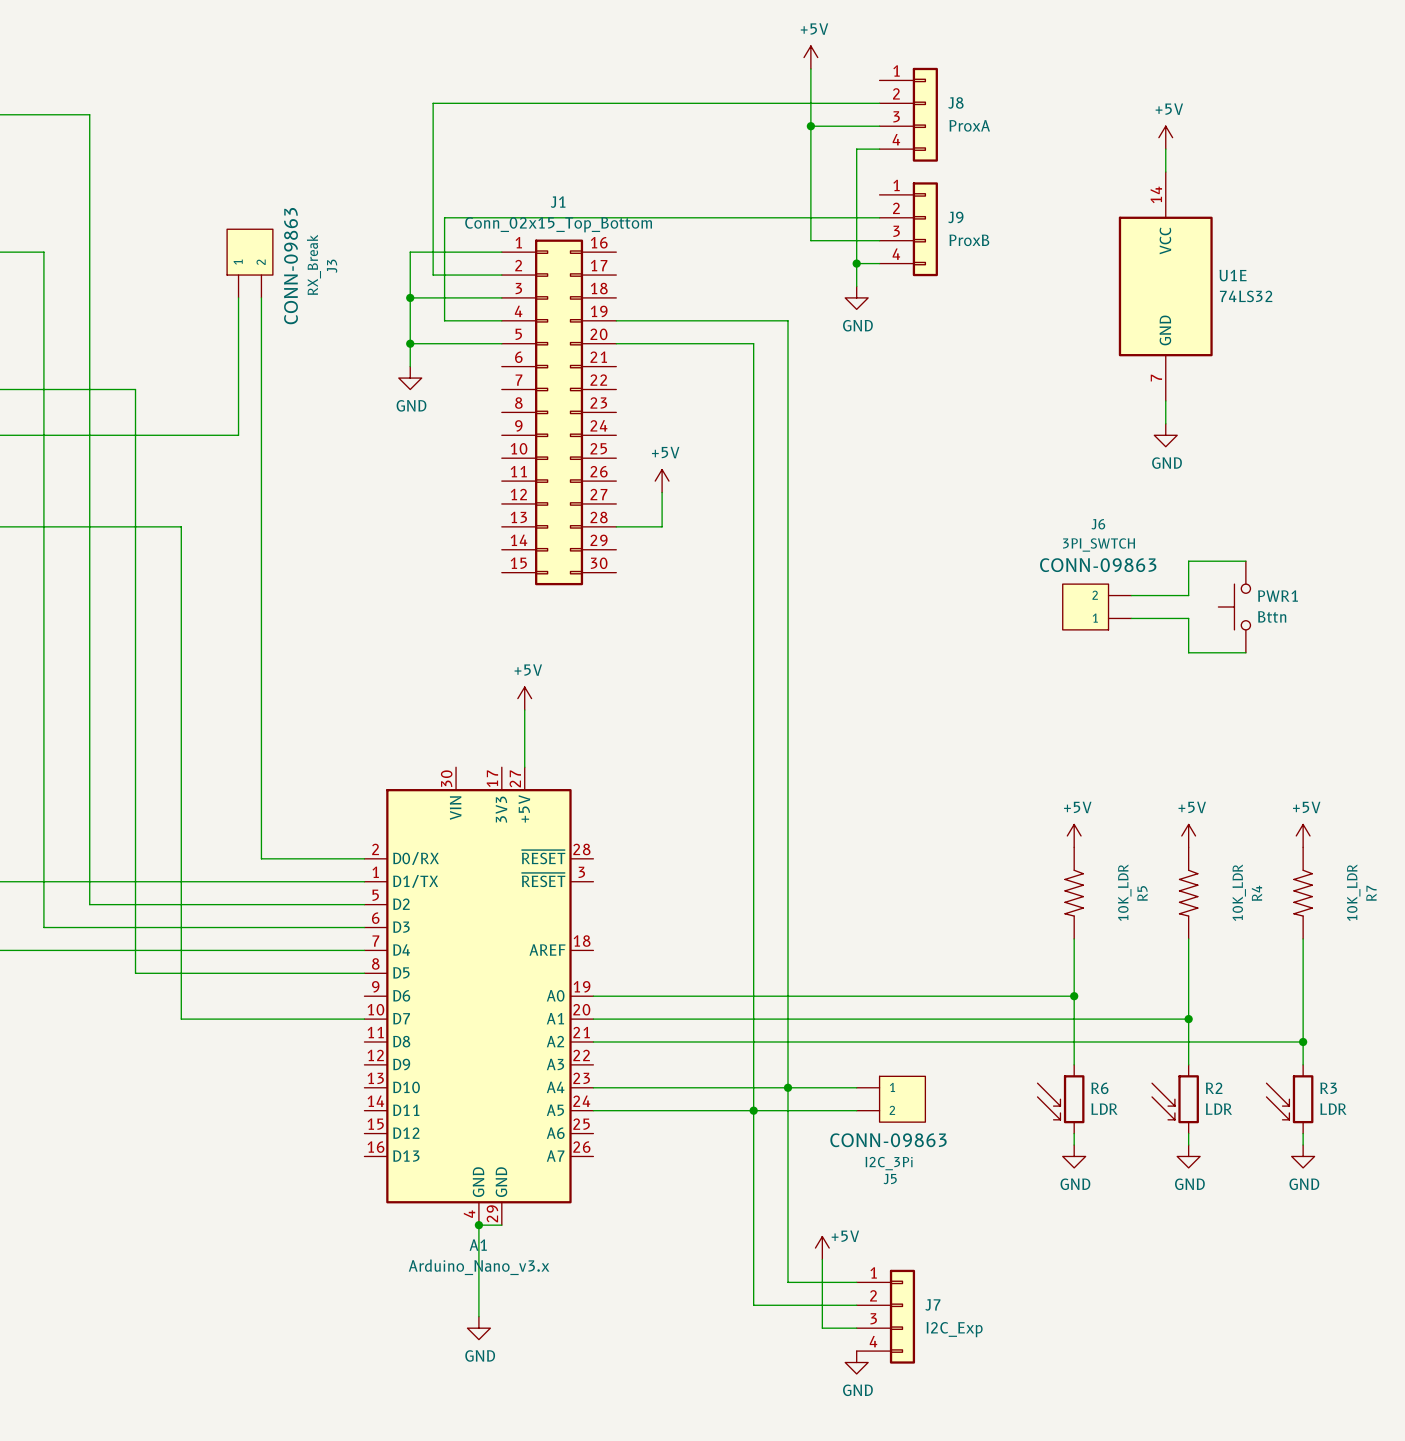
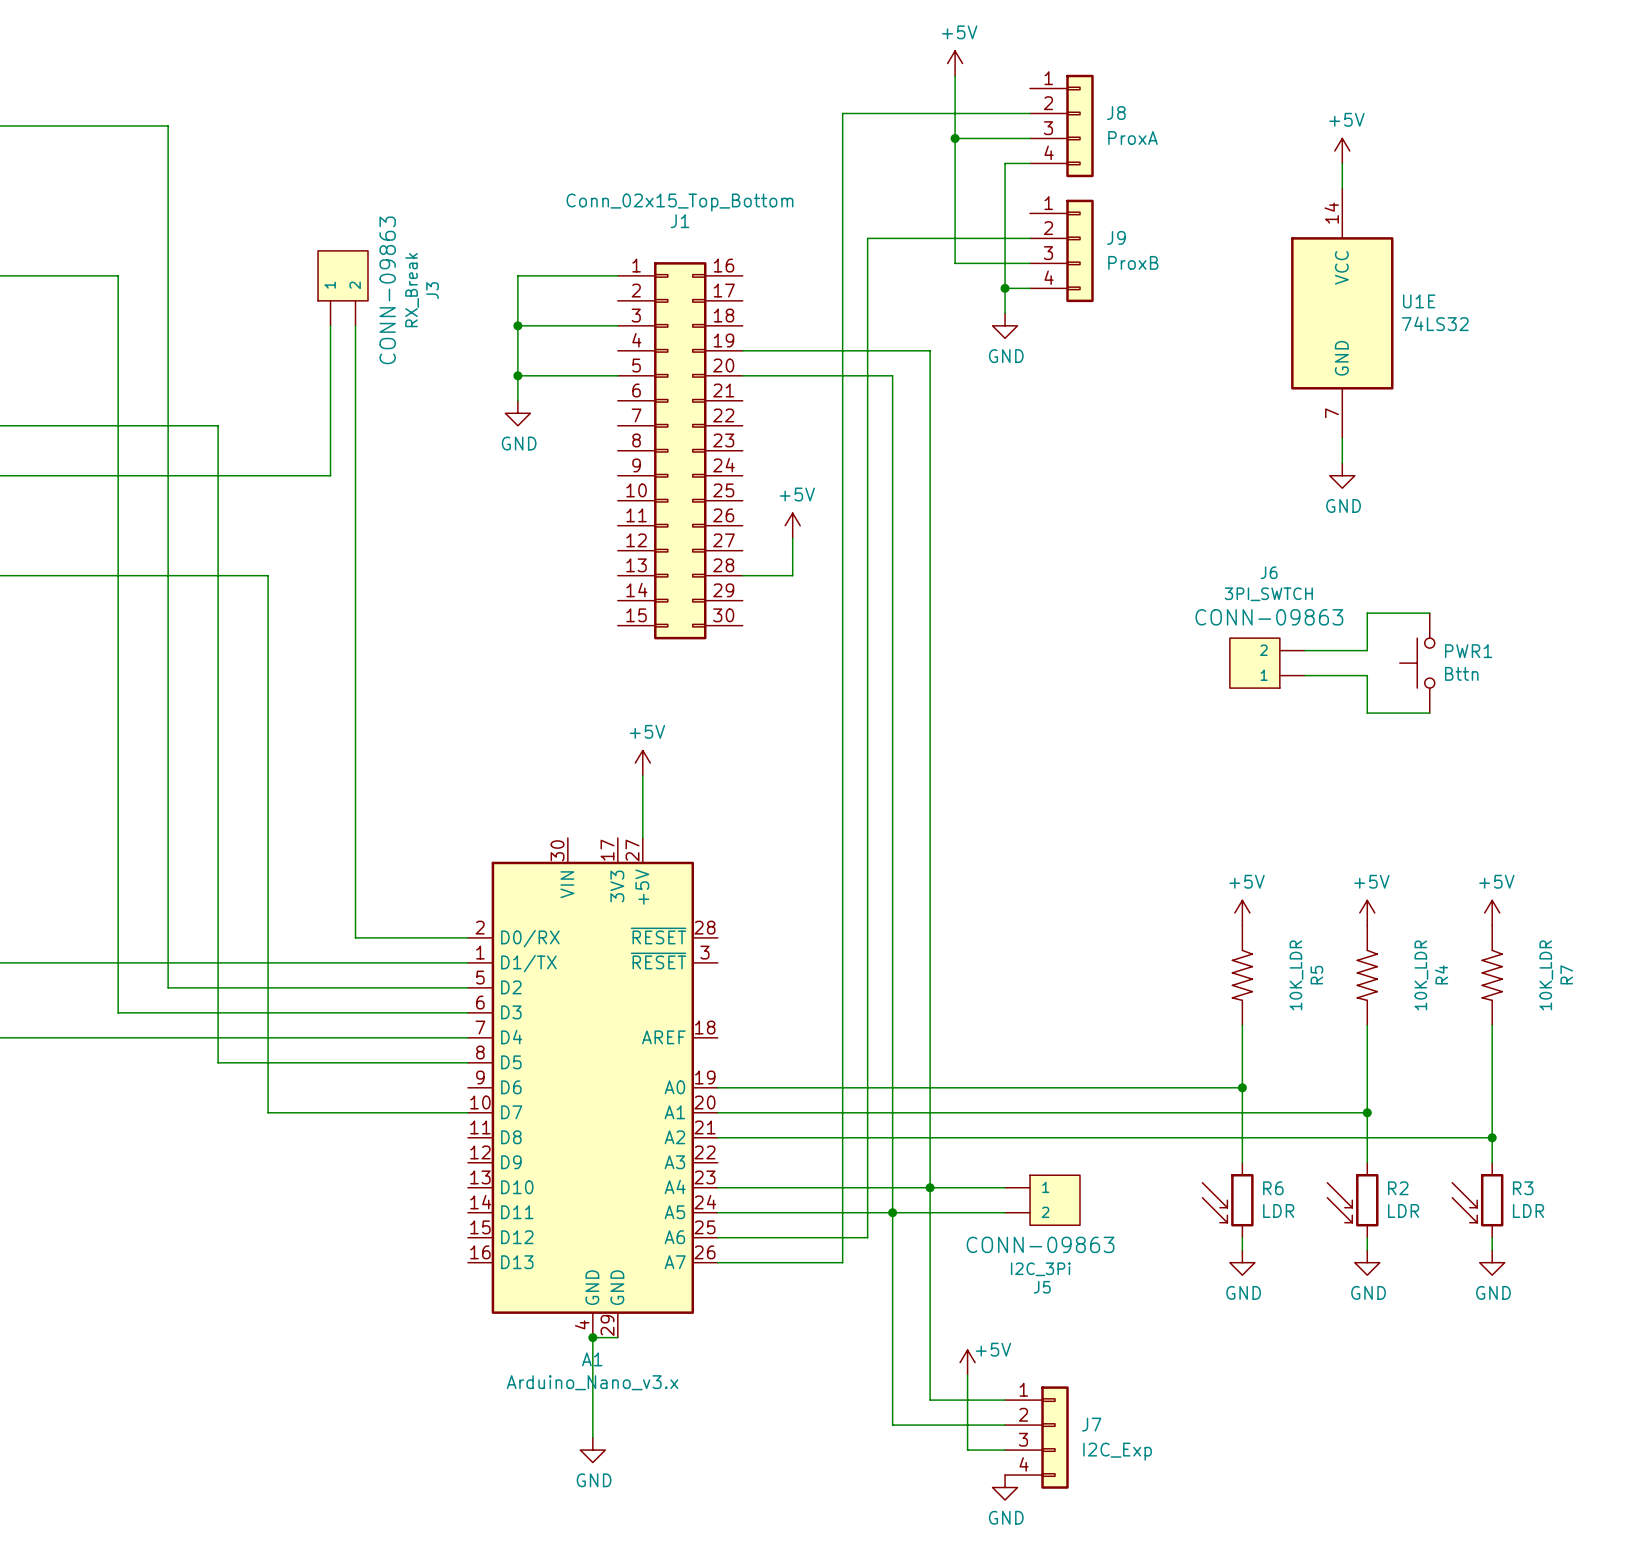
wire: (707, 103) (433, 103) (433, 275) (501, 275) -> (842, 113) (842, 1262) (717, 1262)
wire: (730, 217) (444, 217) (444, 320) (501, 320) -> (867, 238) (867, 1237) (717, 1237)
J1 value position: Conn_02x15_Top_Bottom (558, 224) -> Conn_02x15_Top_Bottom (679, 202)

